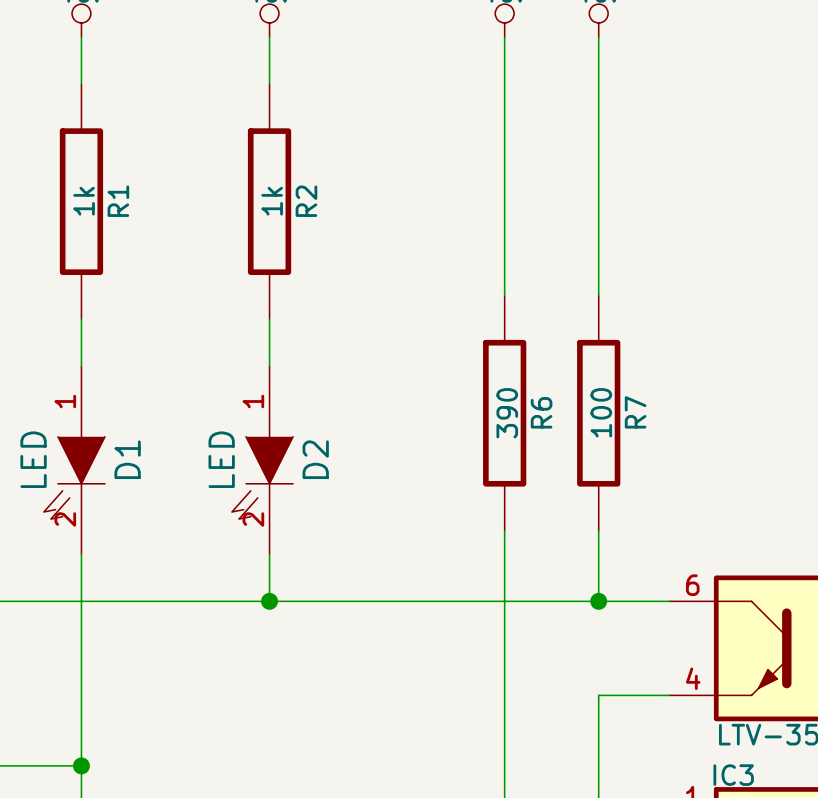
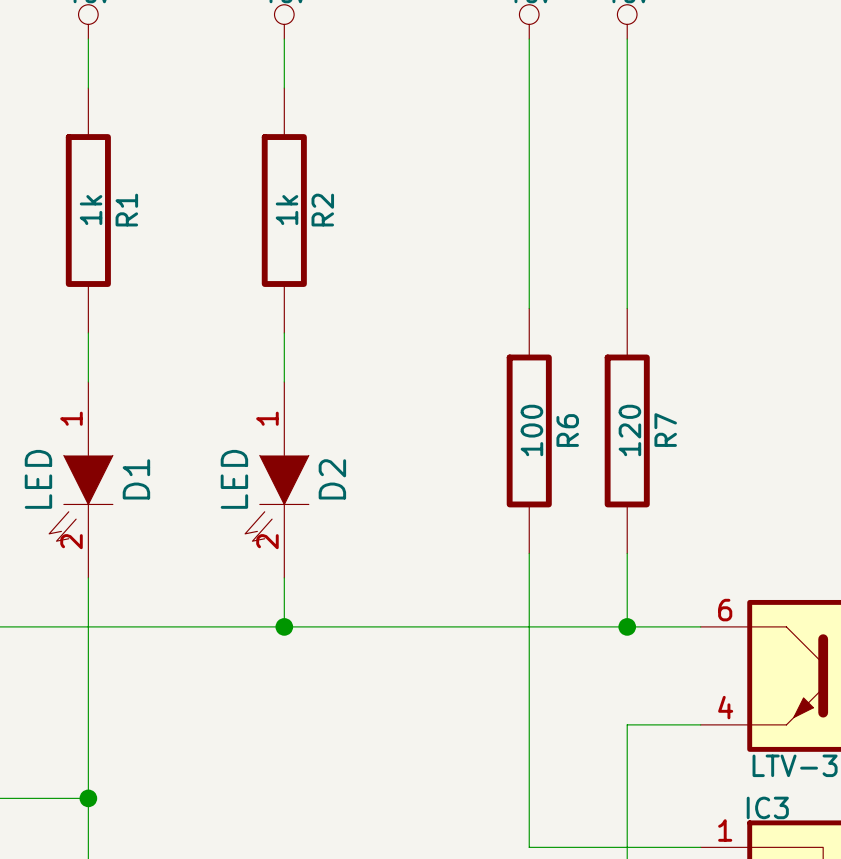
R7 value: 100 (601, 412) -> 120 (629, 430)
R6 value: 390 (507, 413) -> 100 (531, 430)

